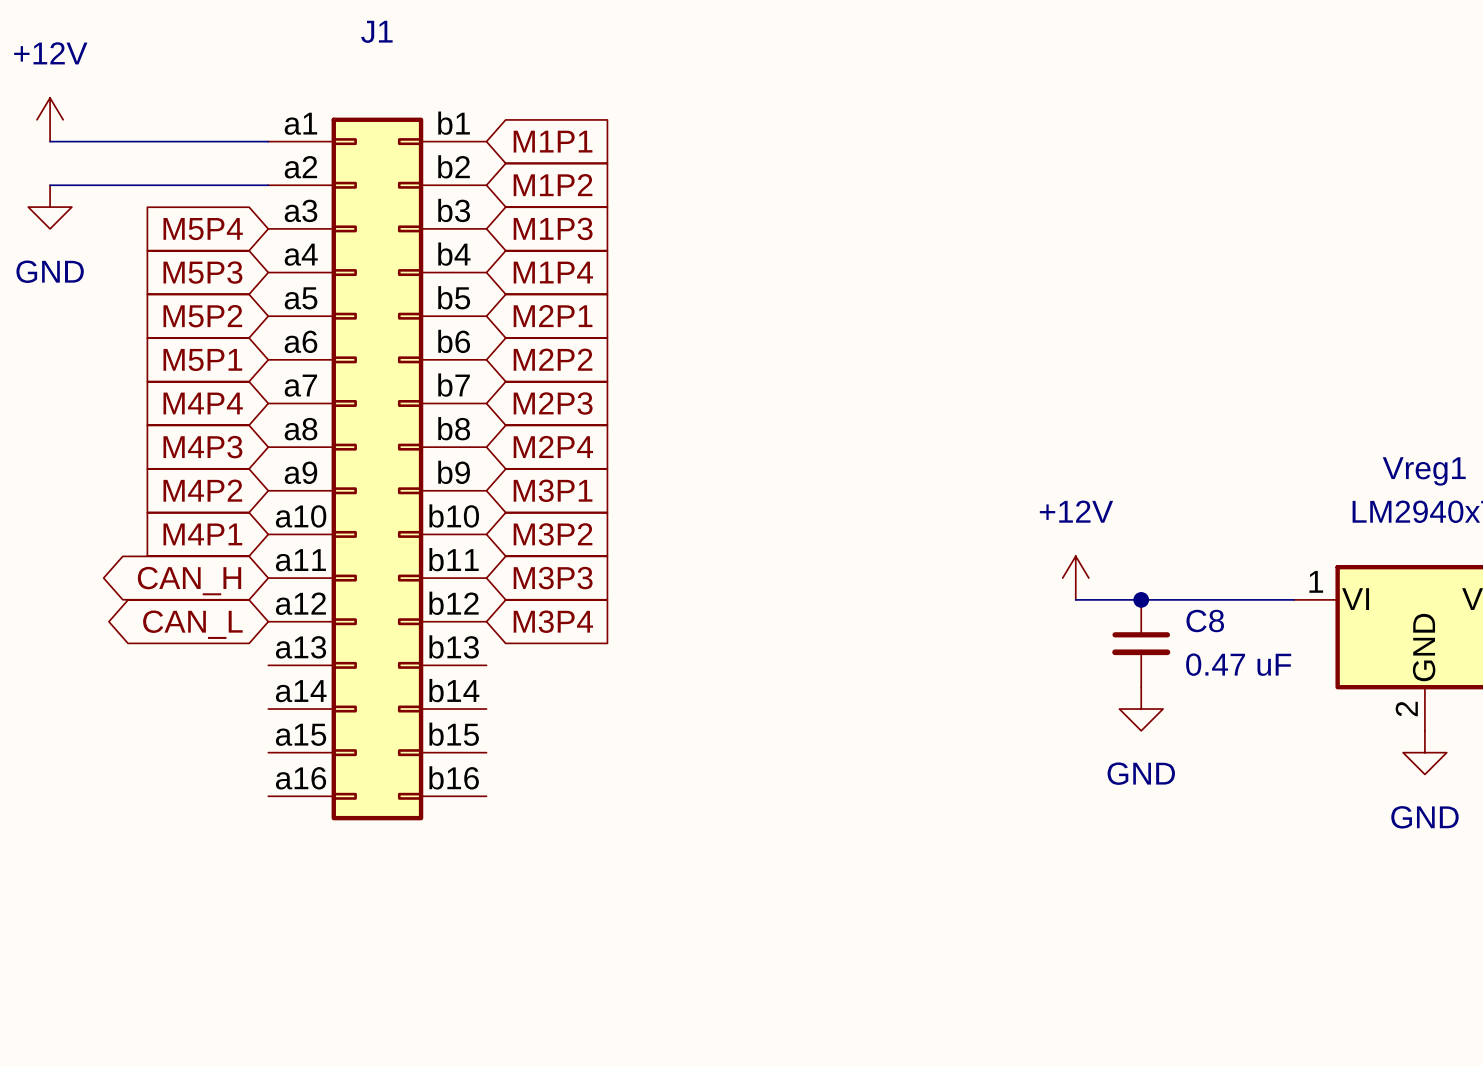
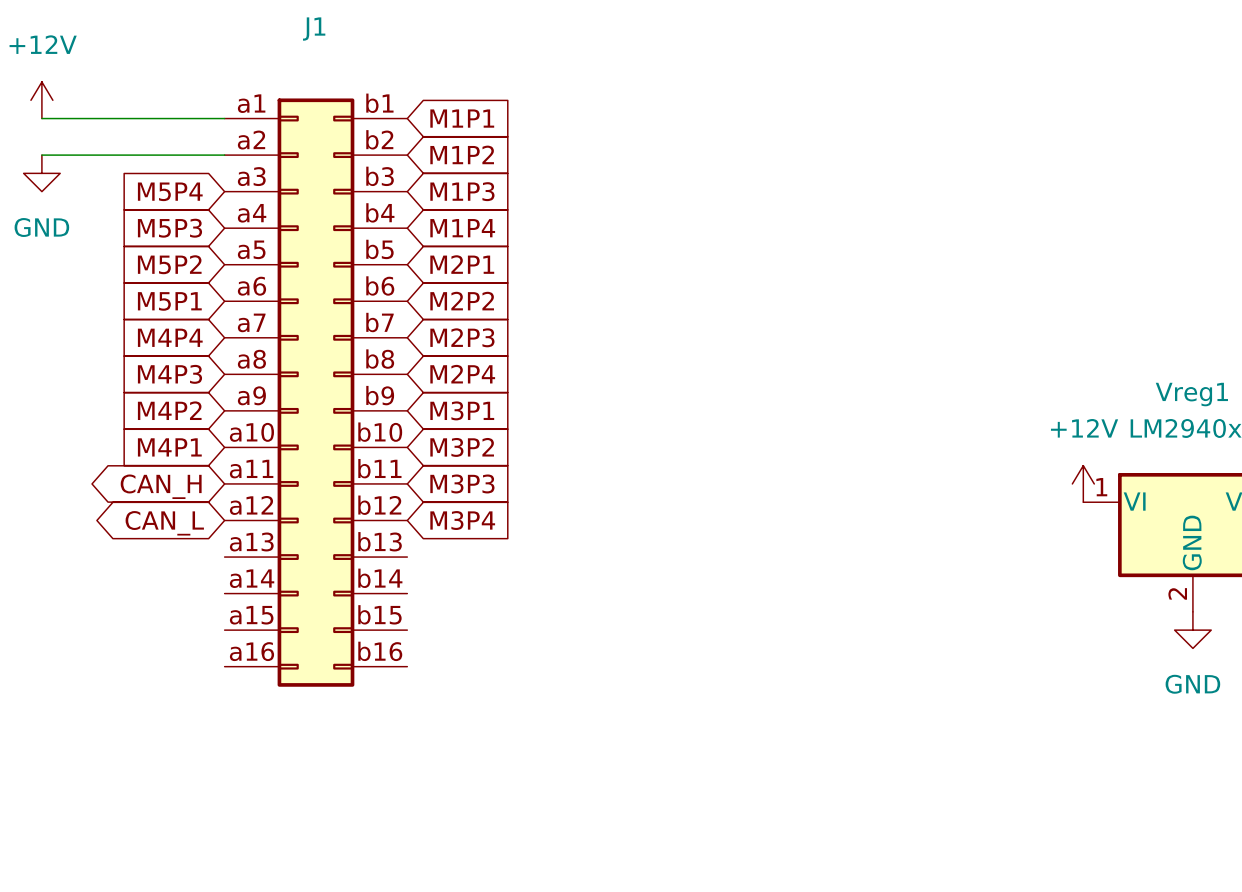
power symbol position: +12V (1075, 578) -> +12V (1083, 483)
wire: (1075, 599) (1293, 599) -> none
junction: (1141, 599) -> none
C8: 0.47 uF (1141, 643) -> none
power symbol: GND (1141, 709) -> none

